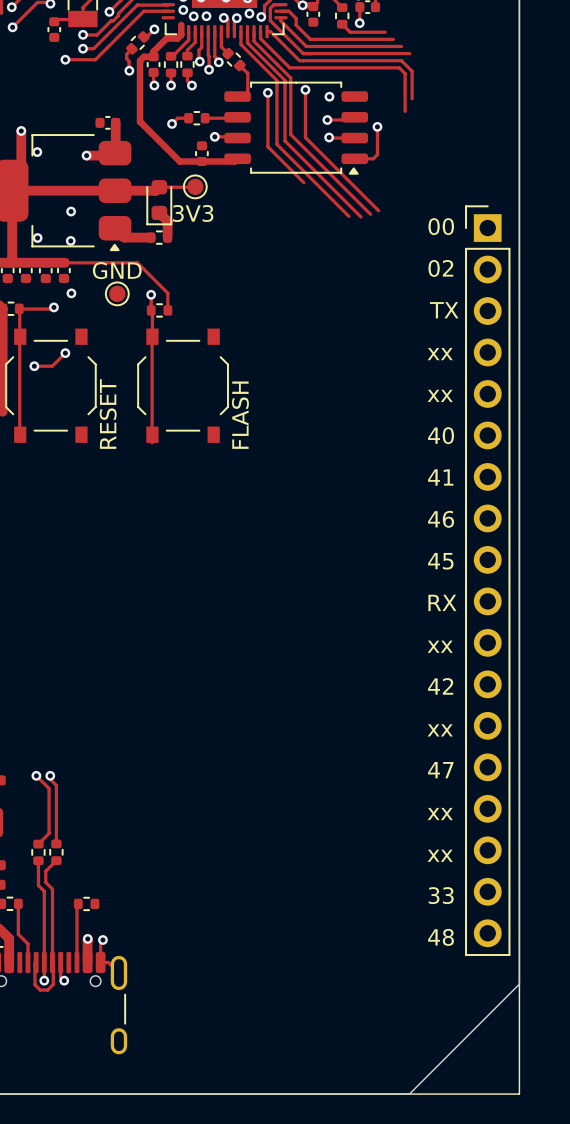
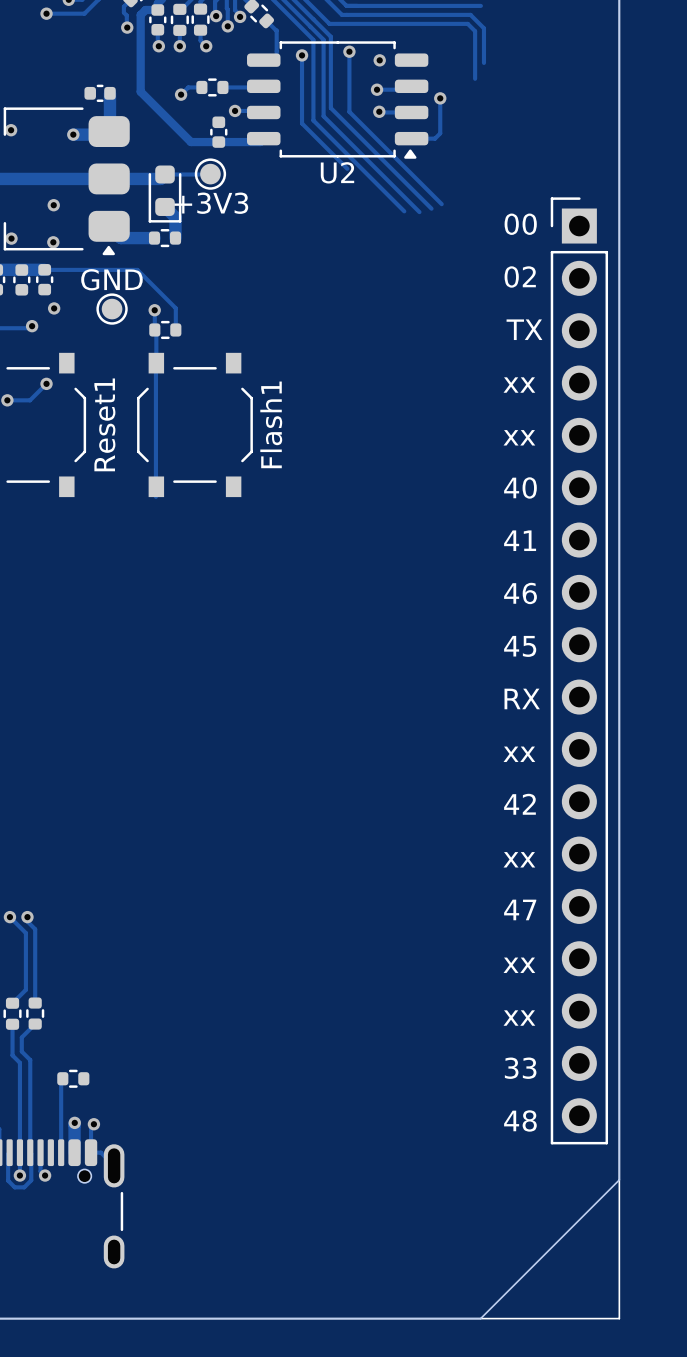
U2 name: none -> U2 (337, 172)
+3V3 name: none -> +3V3 (211, 203)
text: 3V3 (193, 213) -> none
Reset1 name: none -> Reset1 (104, 424)
Flash1 name: none -> Flash1 (271, 424)
text: RESET (108, 414) -> none
text: FLASH (240, 415) -> none

